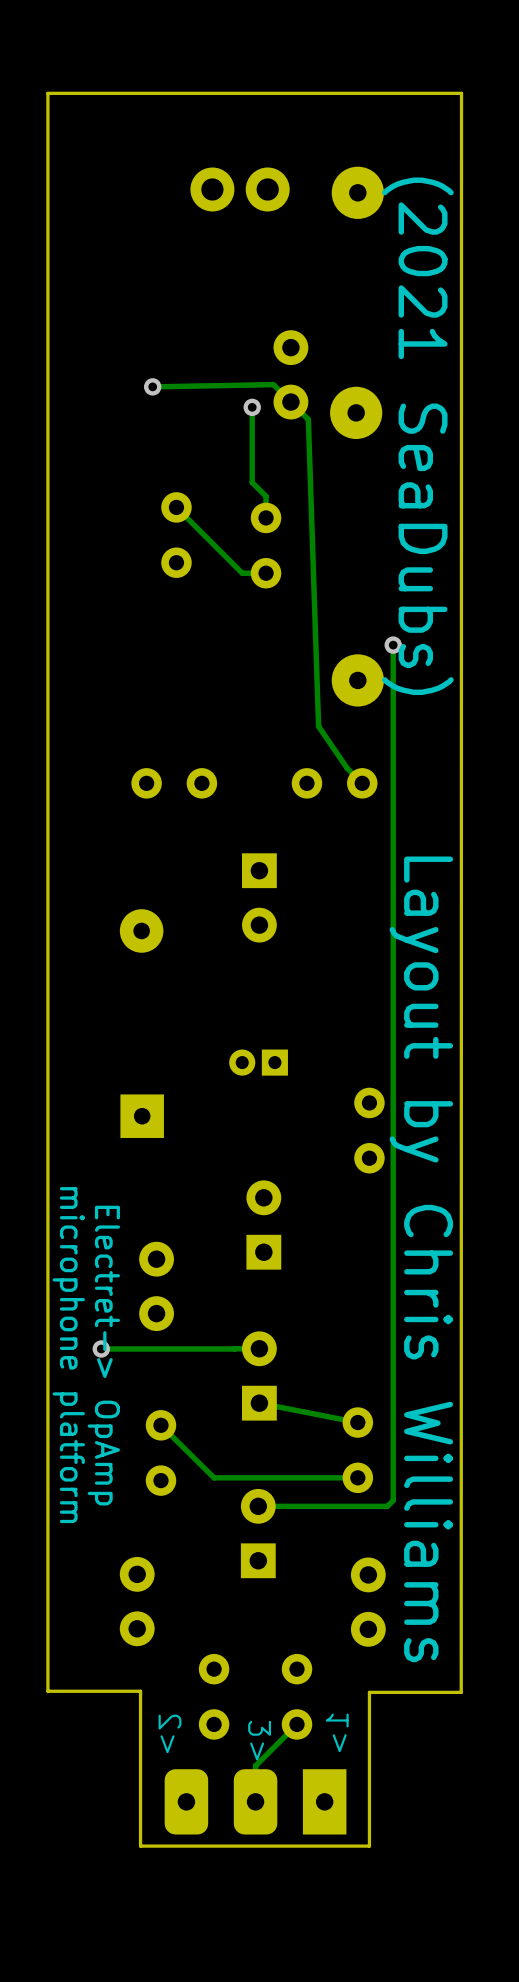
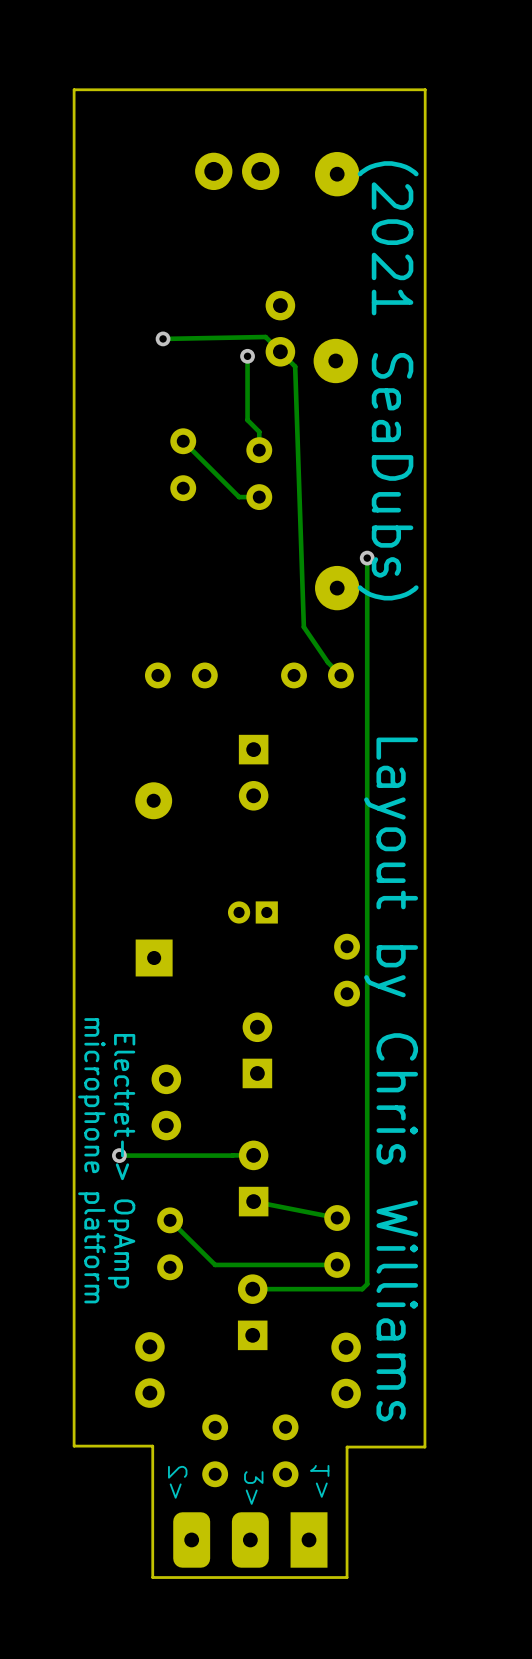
track: (297, 1724) (255, 1765) (255, 1801) -> none

